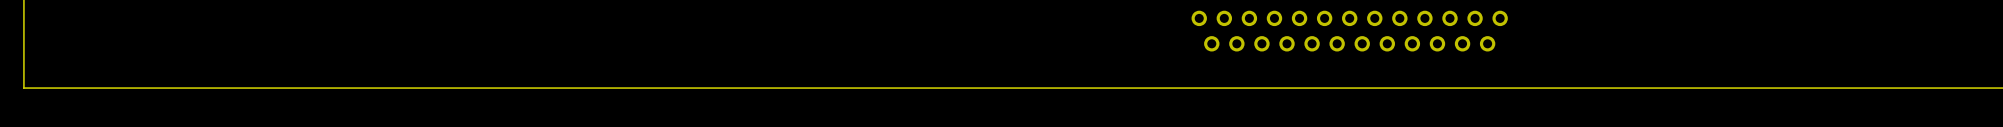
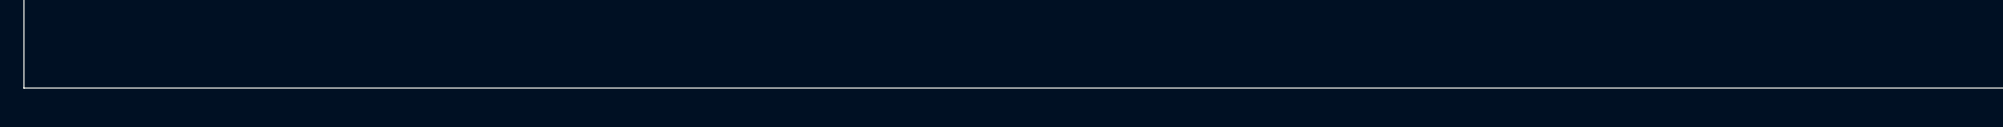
part: (1349, 31) -> none

